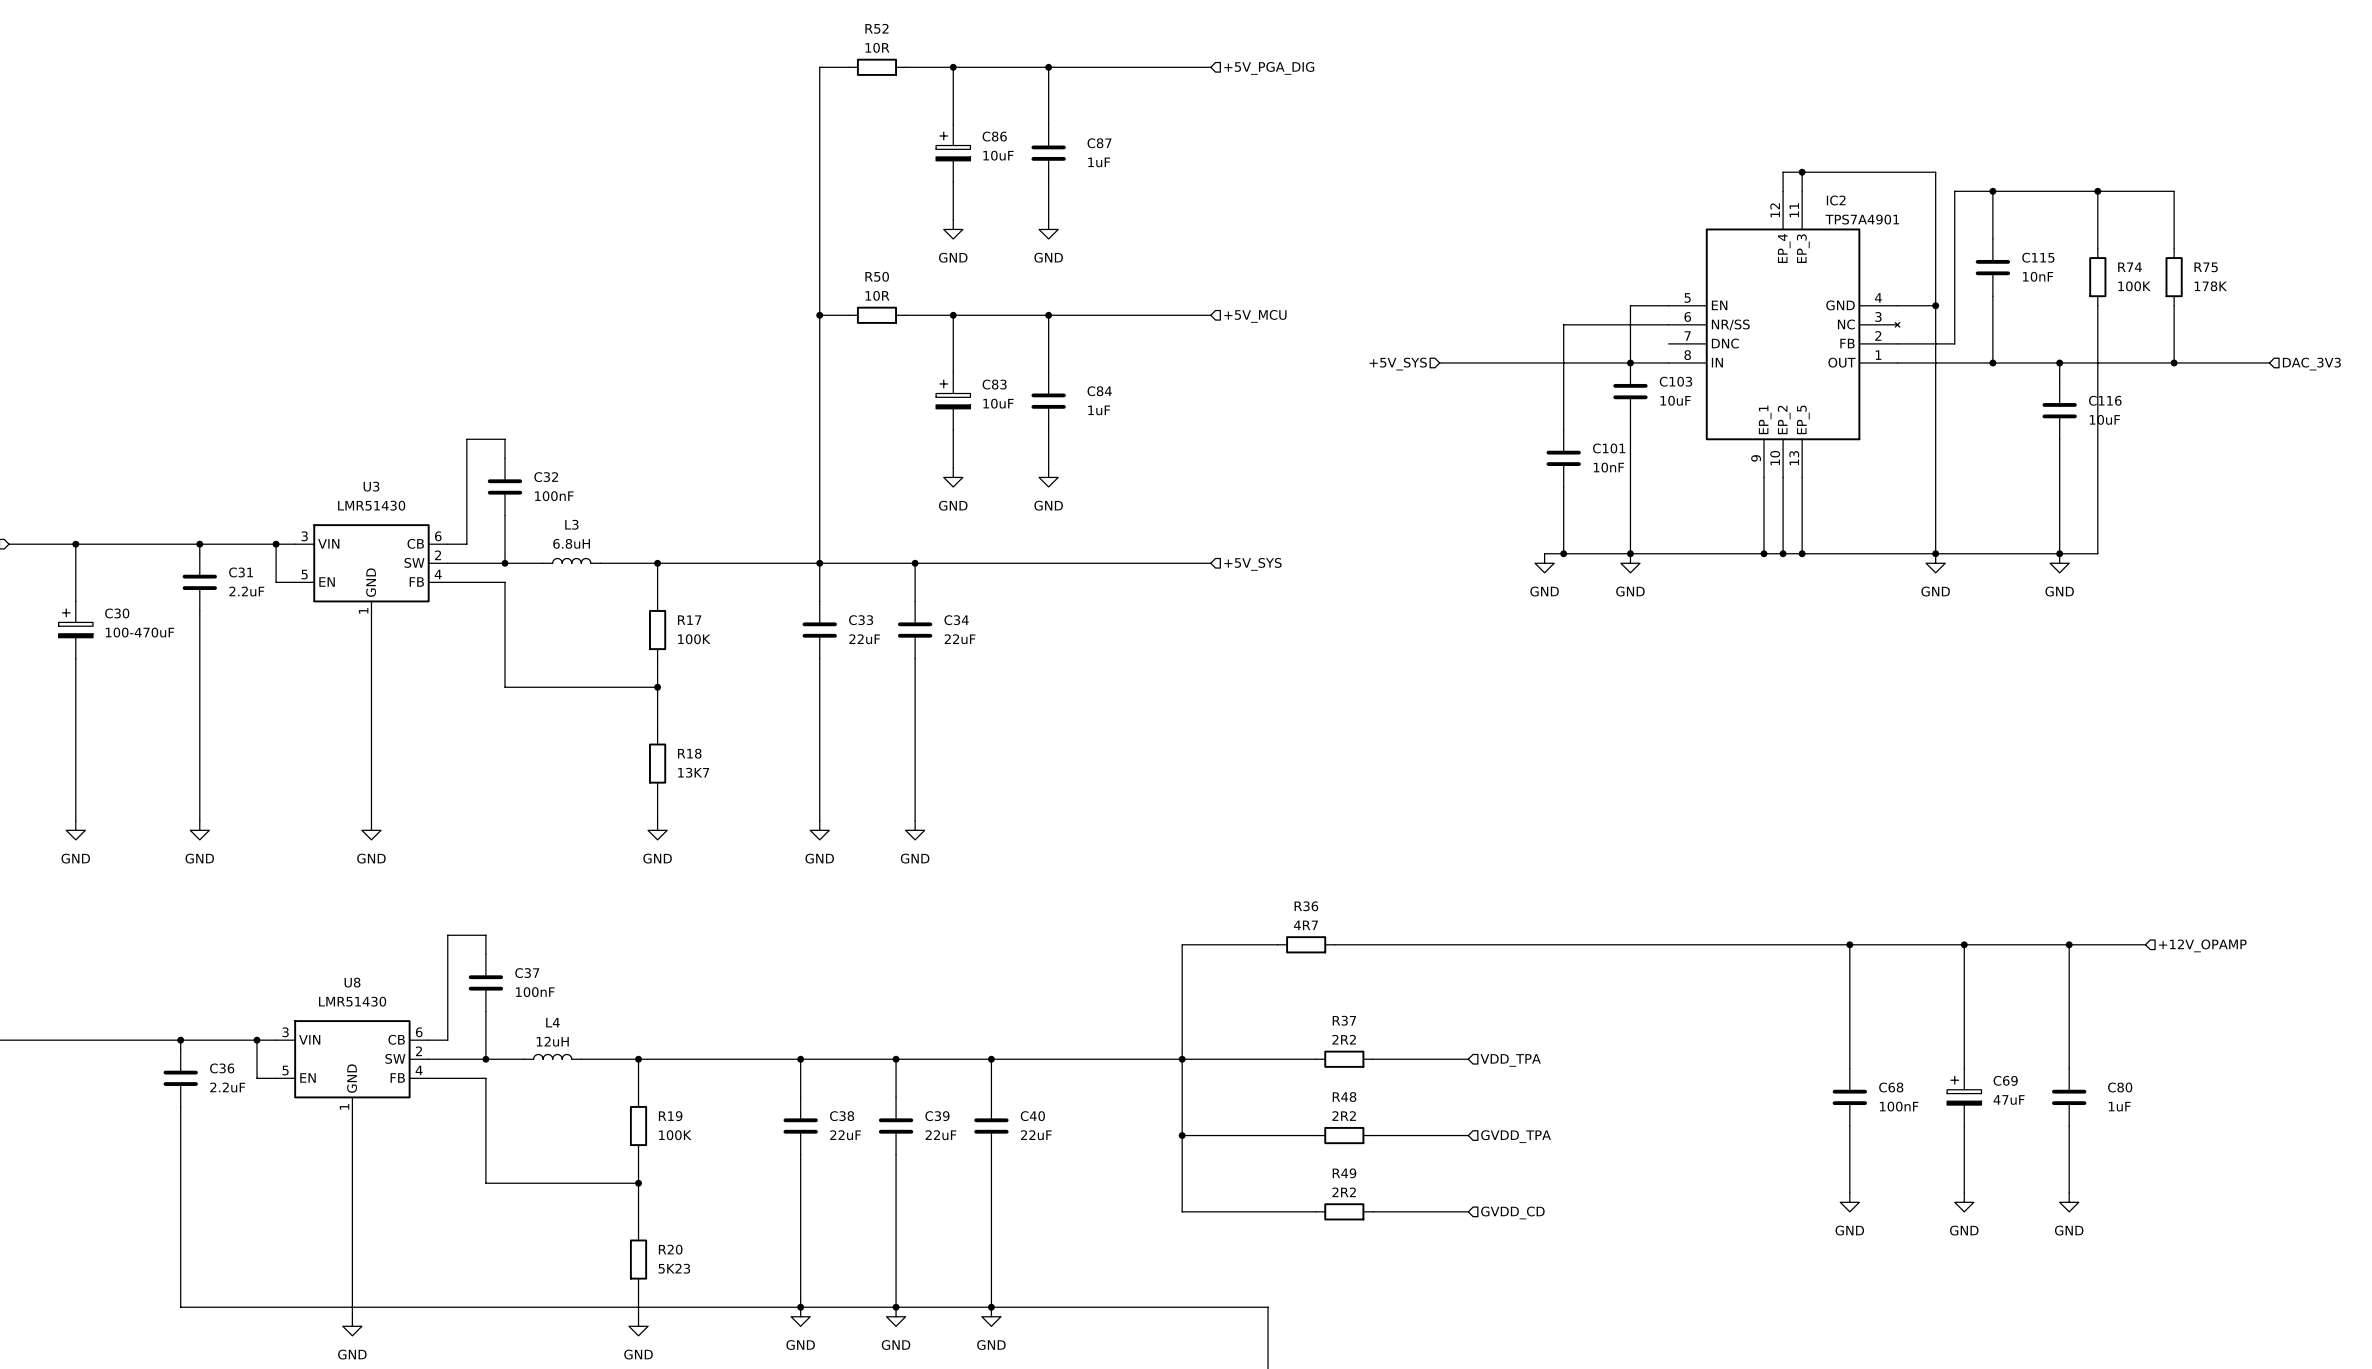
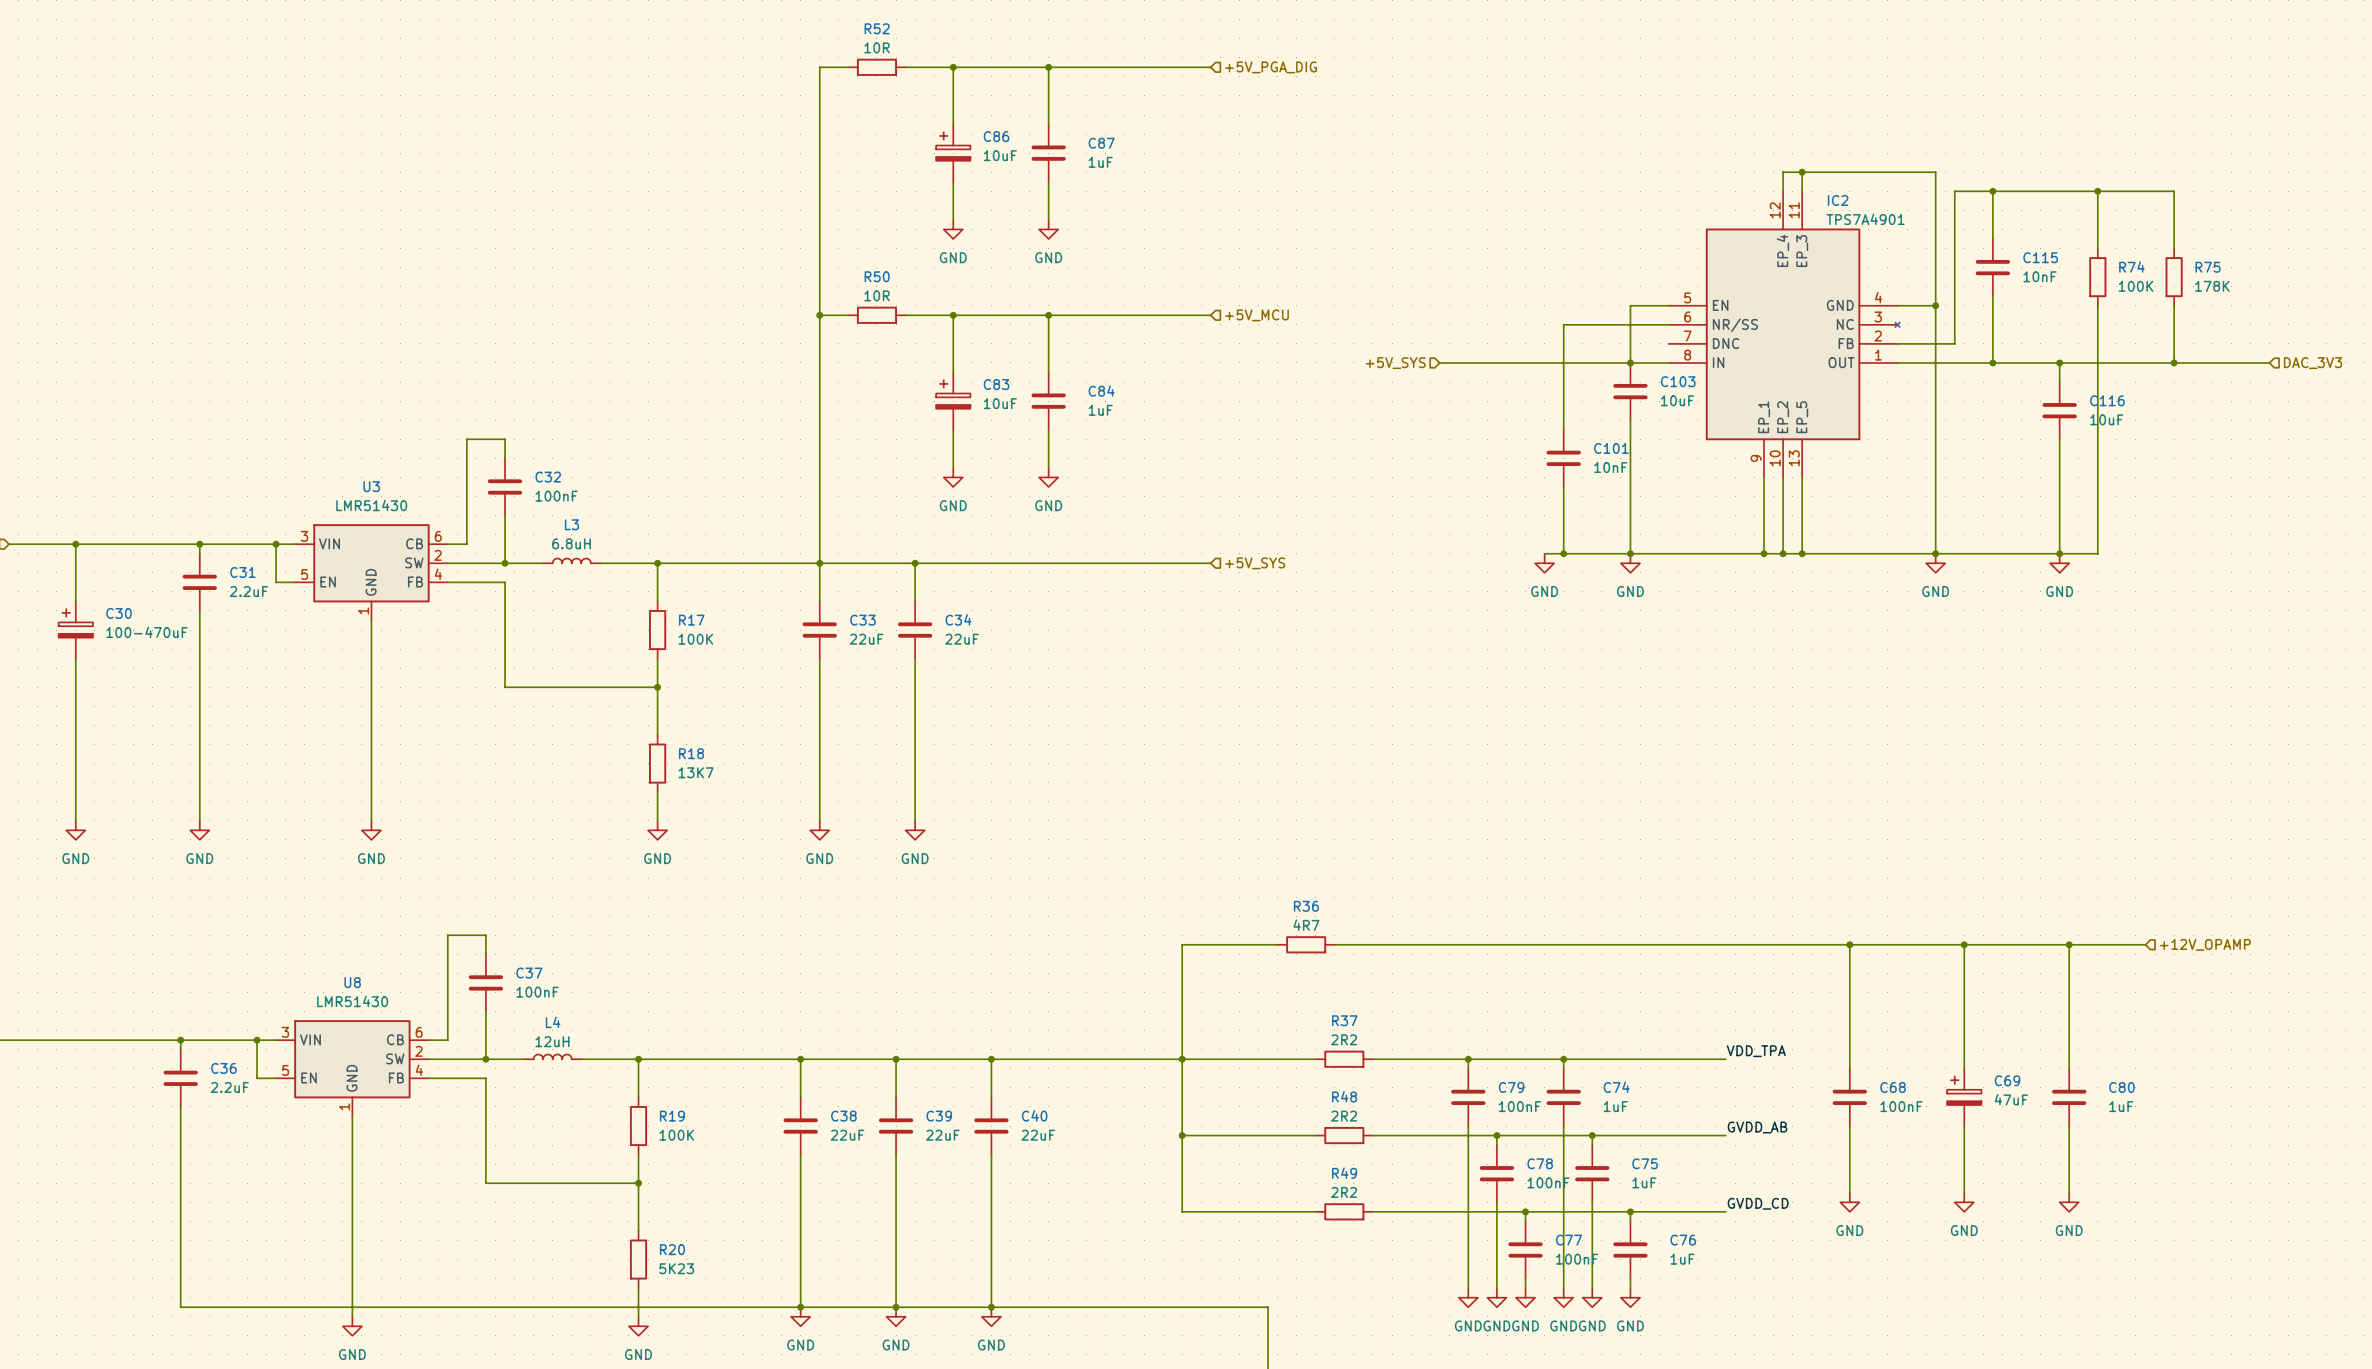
label: none -> VDD_TPA (1756, 1051)
junction: none -> (1468, 1059)
wire: none -> (1563, 1059) (1563, 1068)
junction: none -> (1563, 1059)
wire: none -> (1725, 1059) (1468, 1059) (1468, 1068)
hierarchical label: VDD_TPA (1510, 1060) -> none
C79: none -> 100nF (1468, 1097)
C74: none -> 1uF (1563, 1097)
wire: none -> (1468, 1126) (1468, 1288)
wire: none -> (1563, 1126) (1563, 1288)
label: none -> GVDD_AB (1757, 1127)
wire: none -> (1468, 1135) (1725, 1135)
wire: none -> (1496, 1135) (1496, 1145)
junction: none -> (1496, 1135)
wire: none -> (1592, 1135) (1592, 1145)
junction: none -> (1592, 1135)
hierarchical label: GVDD_TPA (1516, 1136) -> none
C78: none -> 100nF (1496, 1173)
C75: none -> 1uF (1592, 1173)
wire: none -> (1496, 1202) (1496, 1288)
wire: none -> (1592, 1202) (1592, 1288)
label: none -> GVDD_CD (1758, 1203)
wire: none -> (1468, 1211) (1725, 1211)
wire: none -> (1525, 1211) (1525, 1221)
junction: none -> (1525, 1211)
wire: none -> (1630, 1211) (1630, 1221)
junction: none -> (1630, 1211)
hierarchical label: GVDD_CD (1512, 1212) -> none
C77: none -> 100nF (1525, 1250)
C76: none -> 1uF (1630, 1250)
wire: none -> (1525, 1278) (1525, 1288)
wire: none -> (1630, 1278) (1630, 1288)
power symbol: none -> GND (1468, 1297)
power symbol: none -> GND (1496, 1297)
power symbol: none -> GND (1525, 1297)
power symbol: none -> GND (1563, 1297)
power symbol: none -> GND (1592, 1297)
power symbol: none -> GND (1630, 1297)

